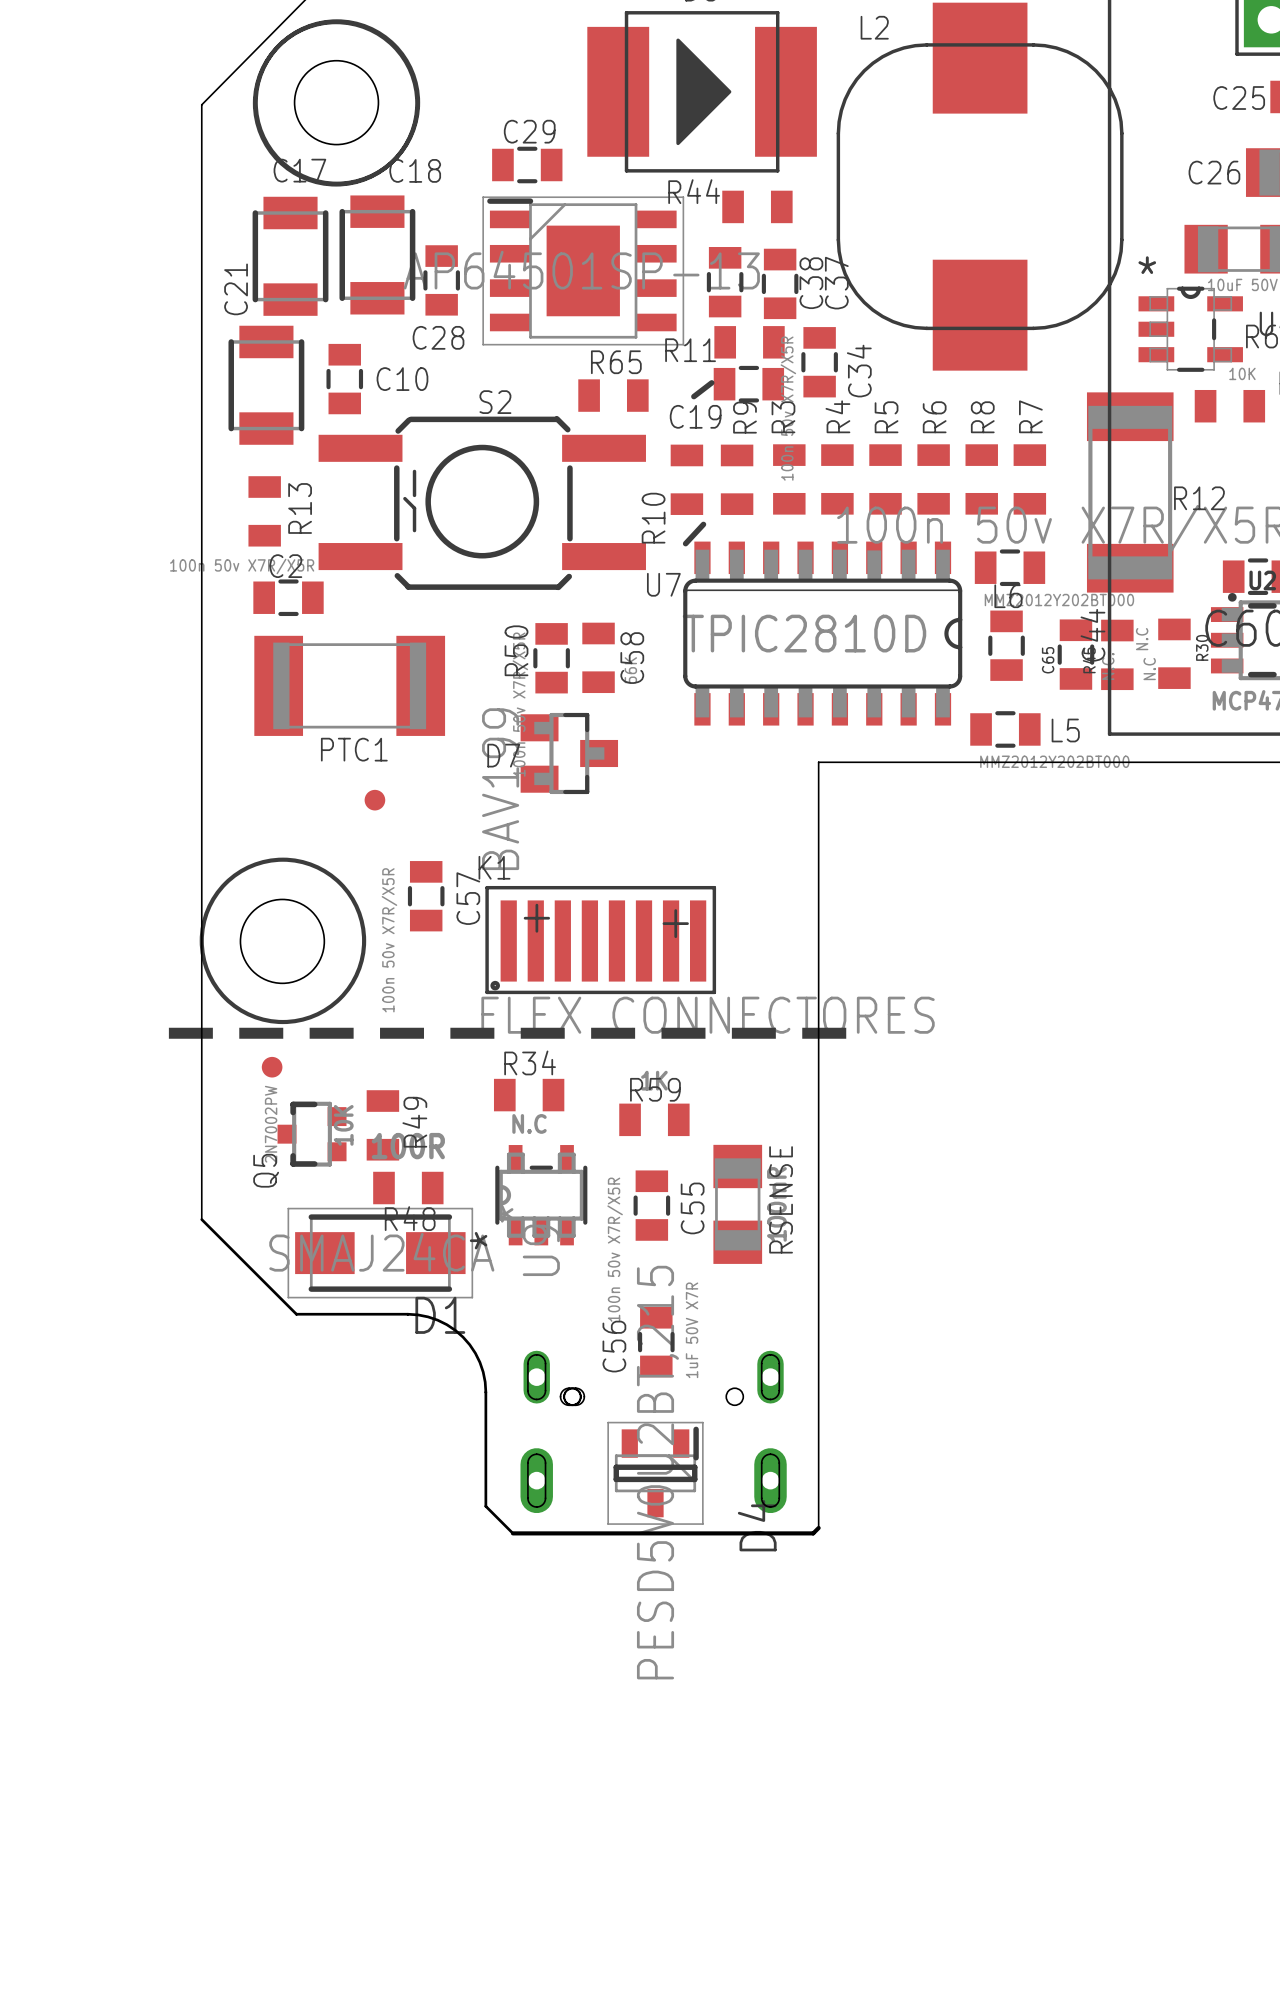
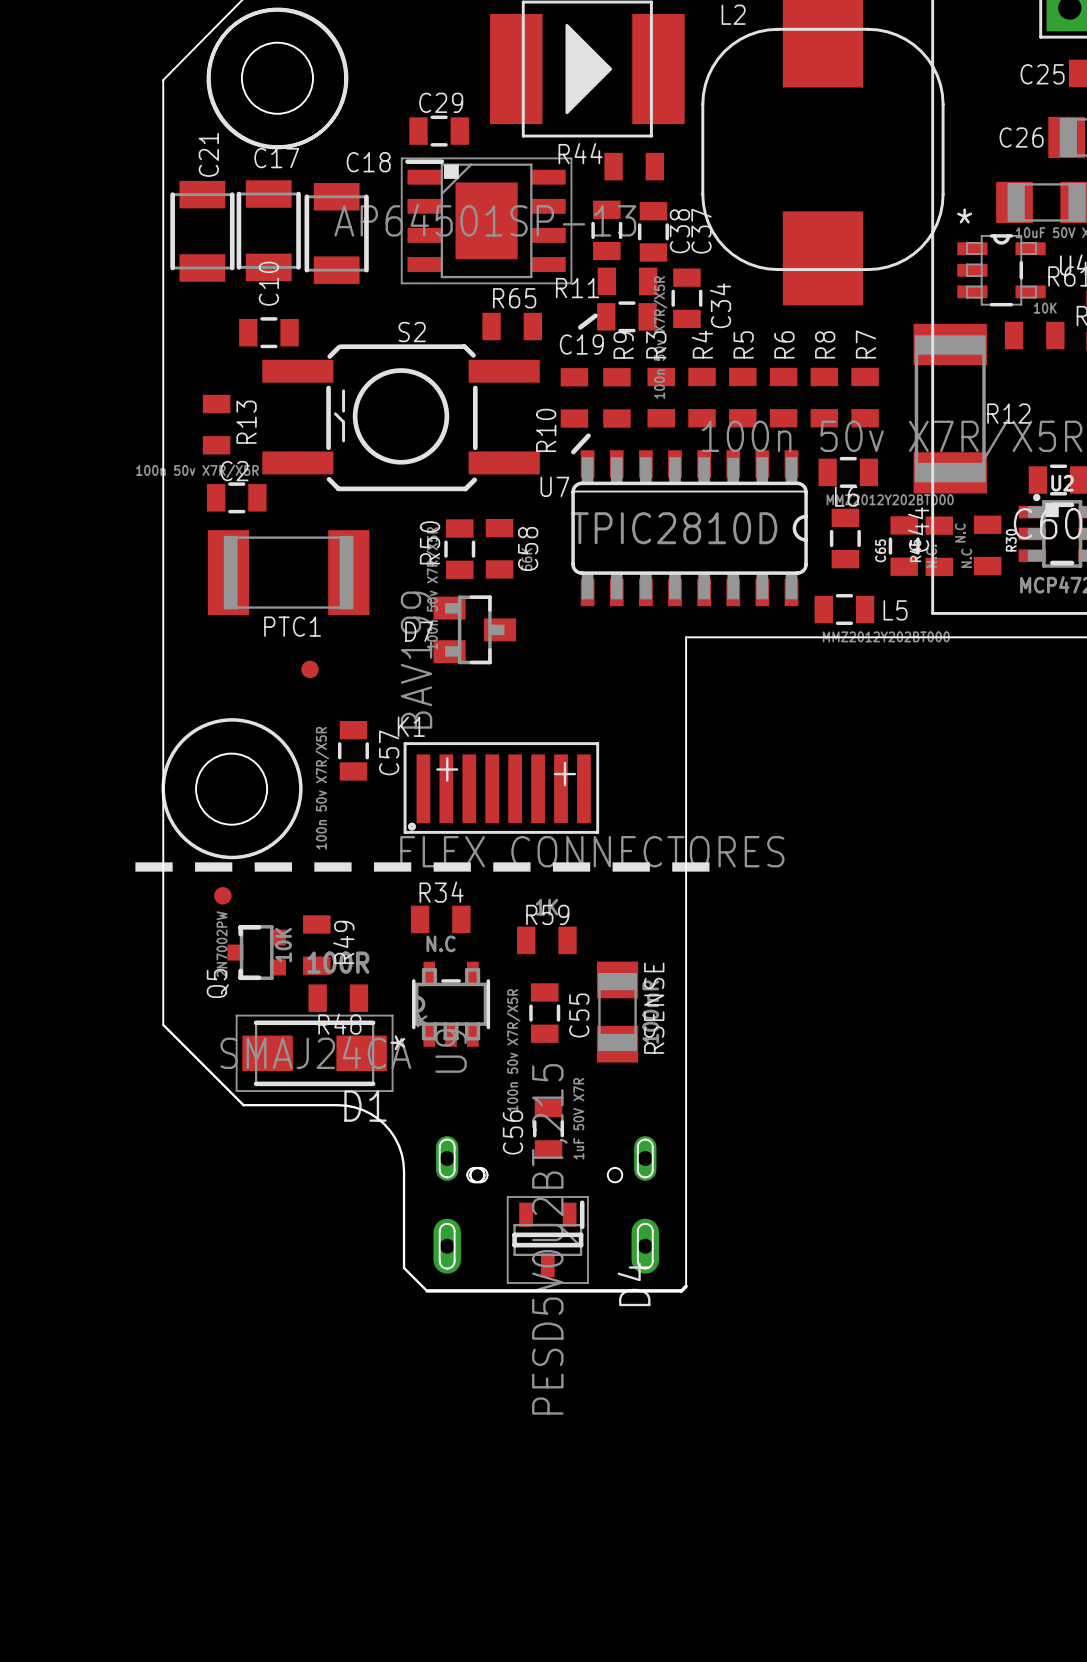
drawing: none -> [443, 164, 459, 179]
C18 position: (377, 254) -> (336, 233)
C17 position: (290, 256) -> (268, 230)
C28: (441, 280) -> none
C21 name position: C21 (236, 289) -> C21 (208, 154)
C10 rotation: 0° (344, 379) -> 90° clockwise (268, 332)
C10 name position: C10 (402, 379) -> C10 (268, 283)
C21 position: (266, 385) -> (202, 231)
drawing: none -> [1045, 502, 1059, 518]

